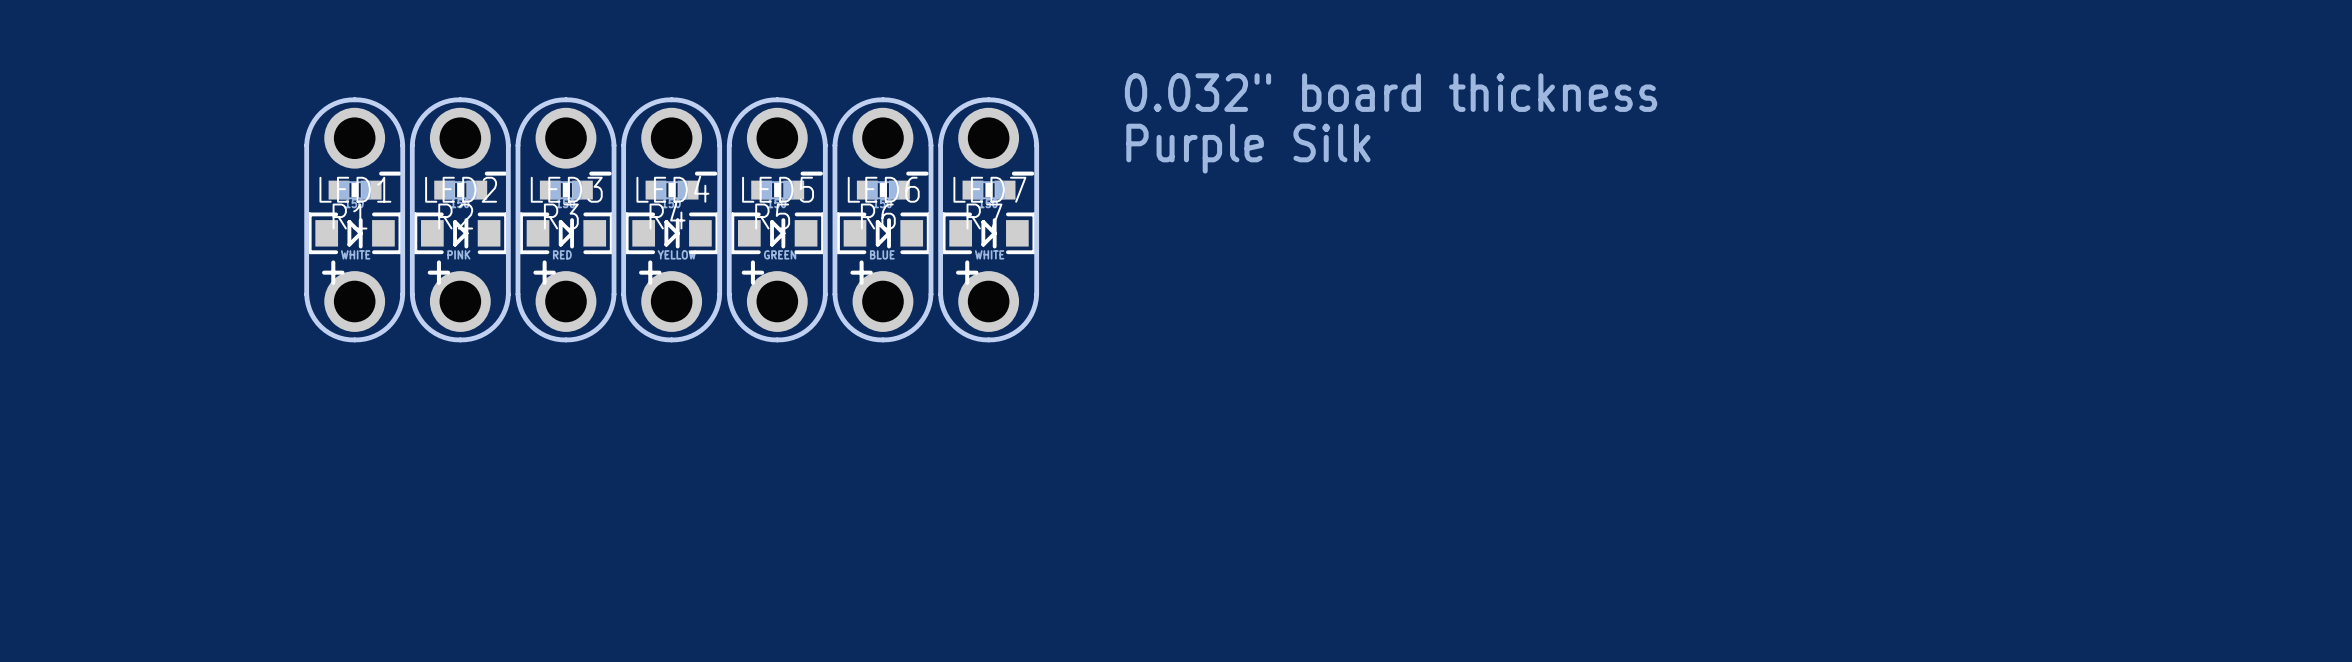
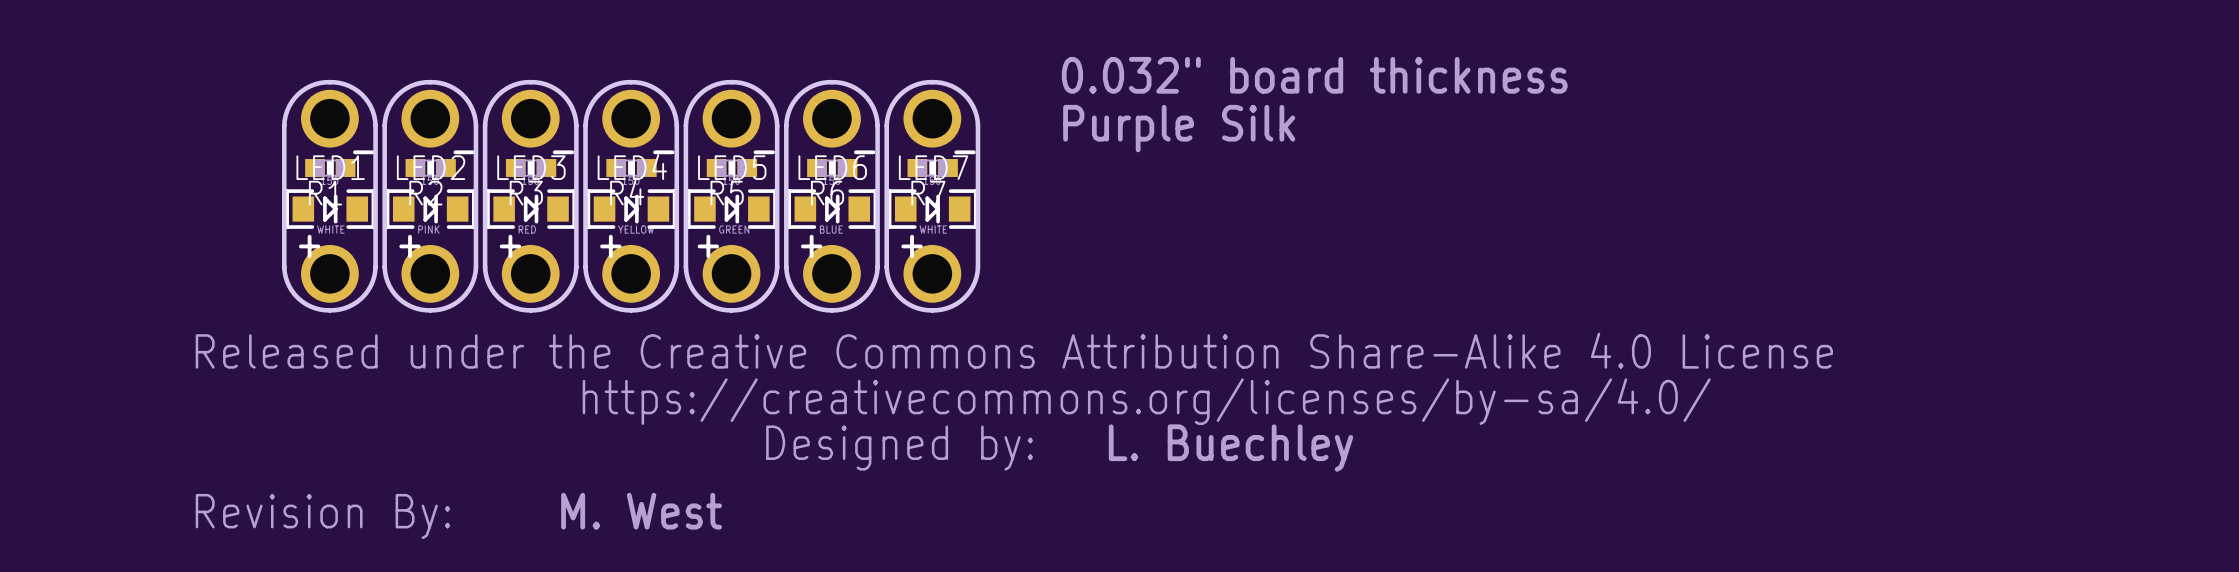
drawing: none -> [195, 332, 1834, 540]
text: none -> L. Buechley (1231, 448)
text: none -> M. West (641, 511)

